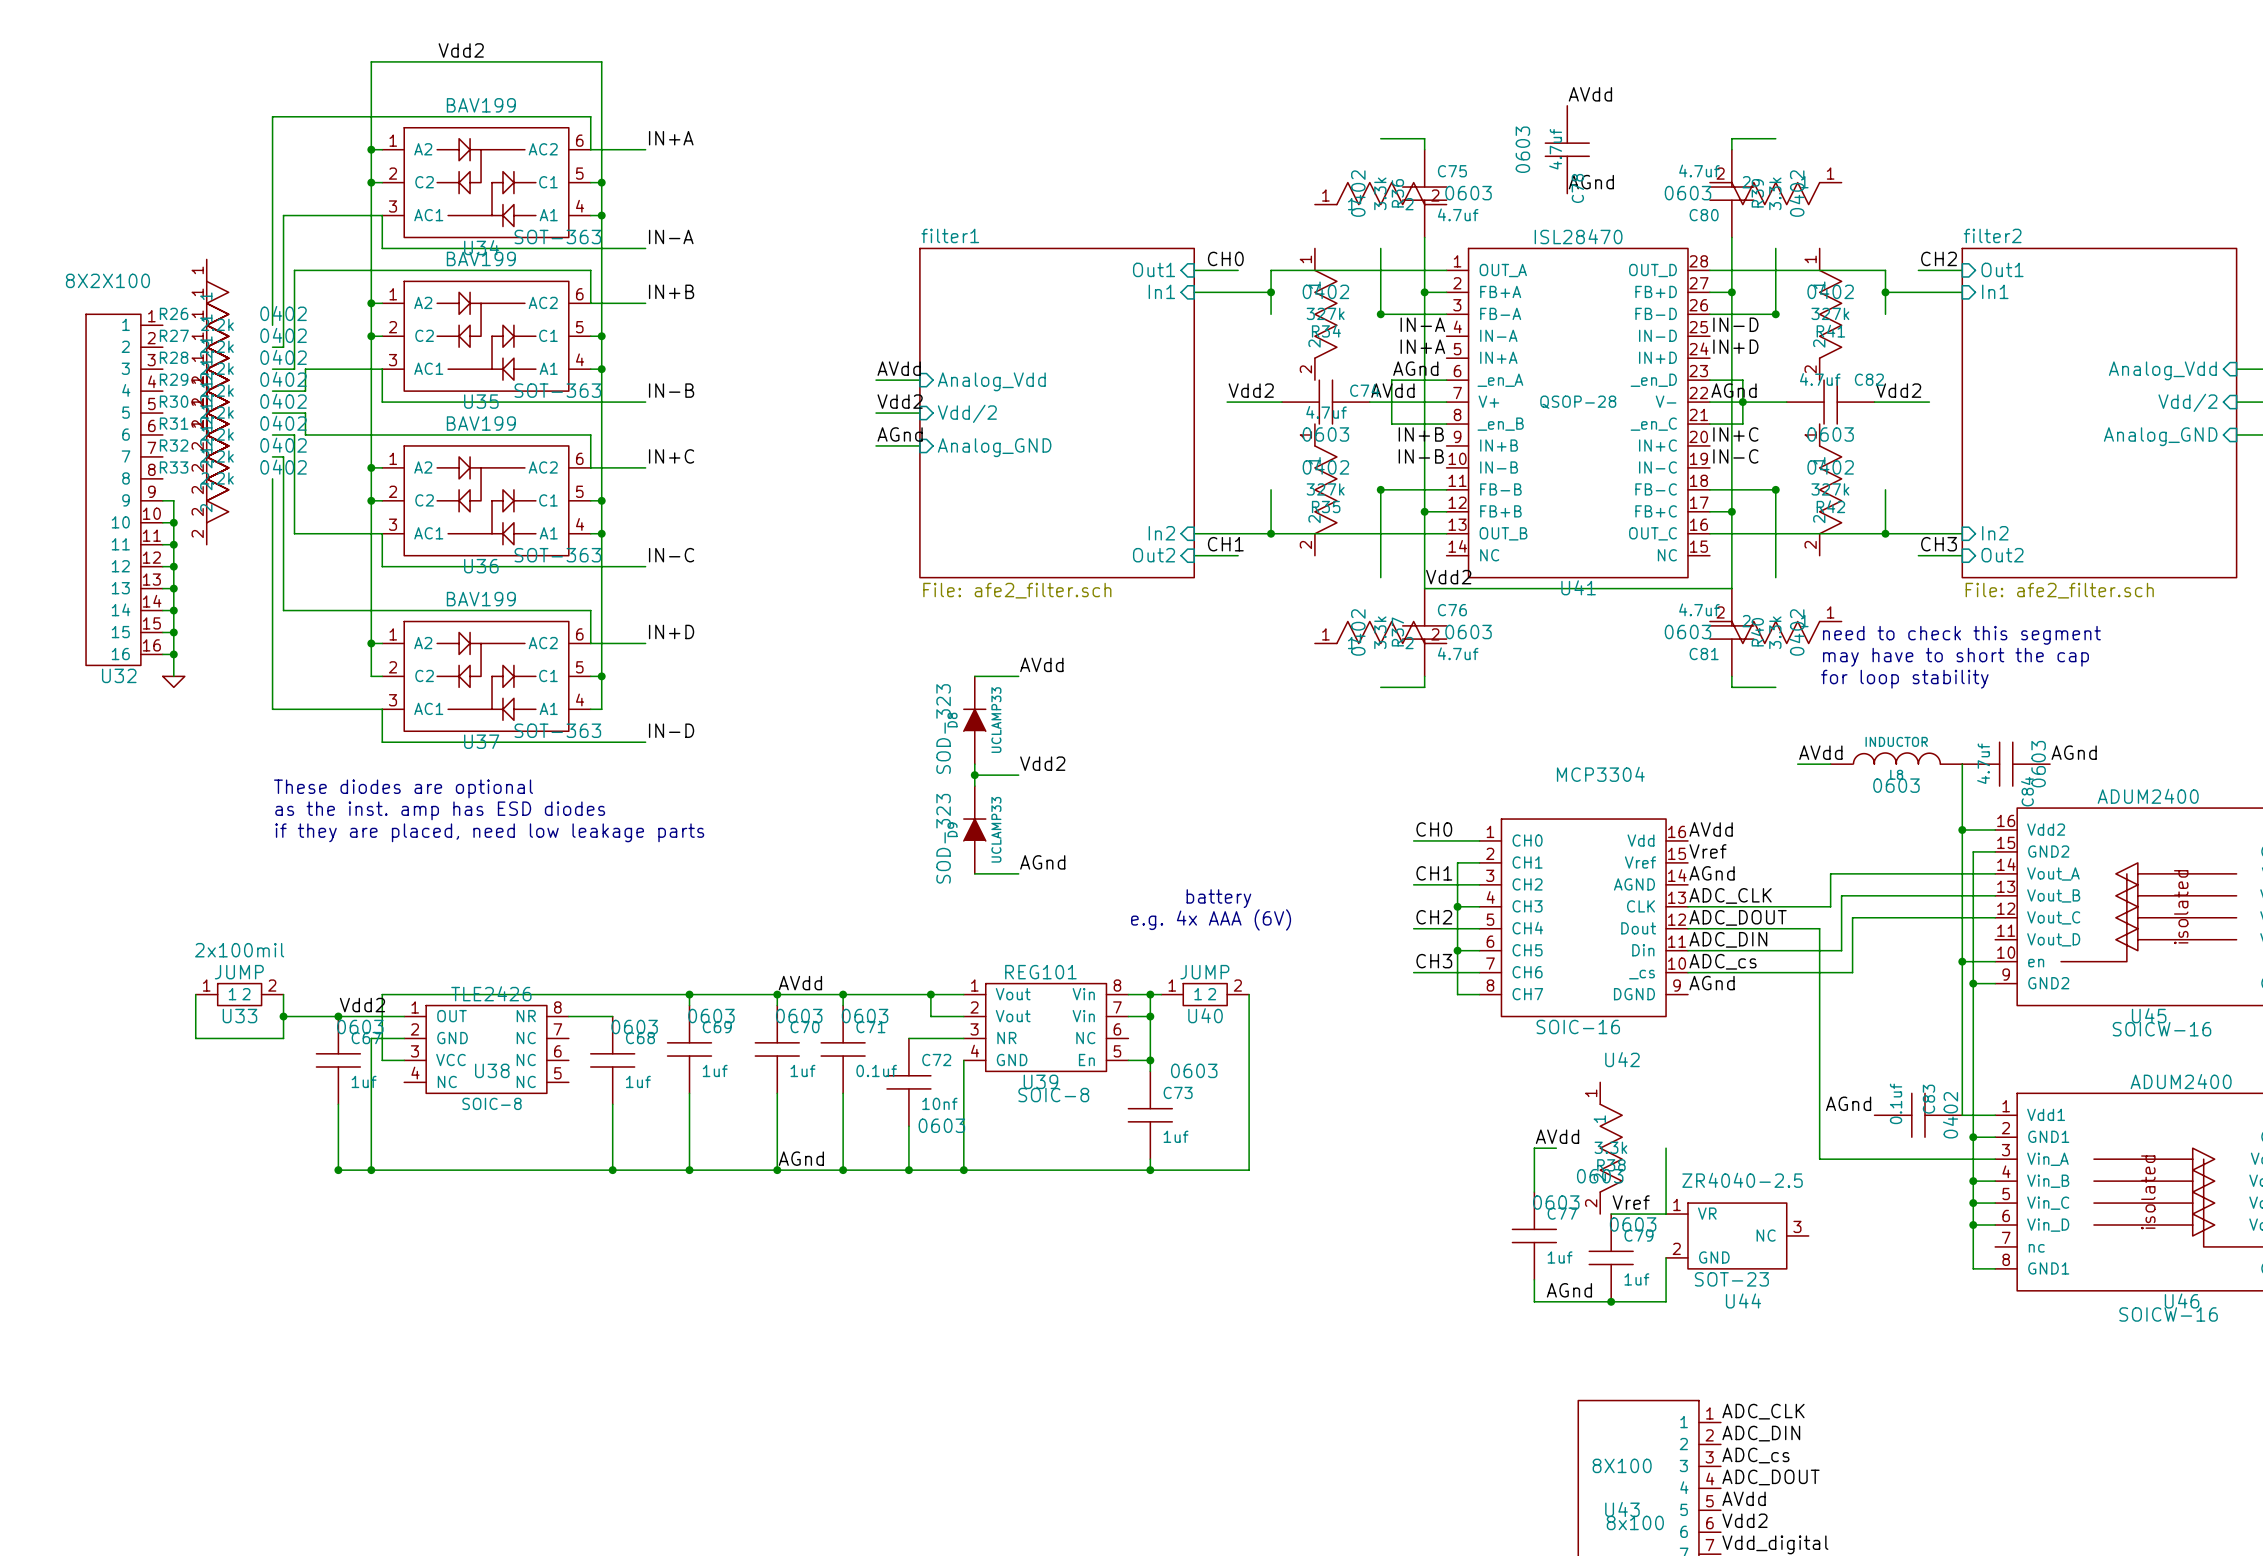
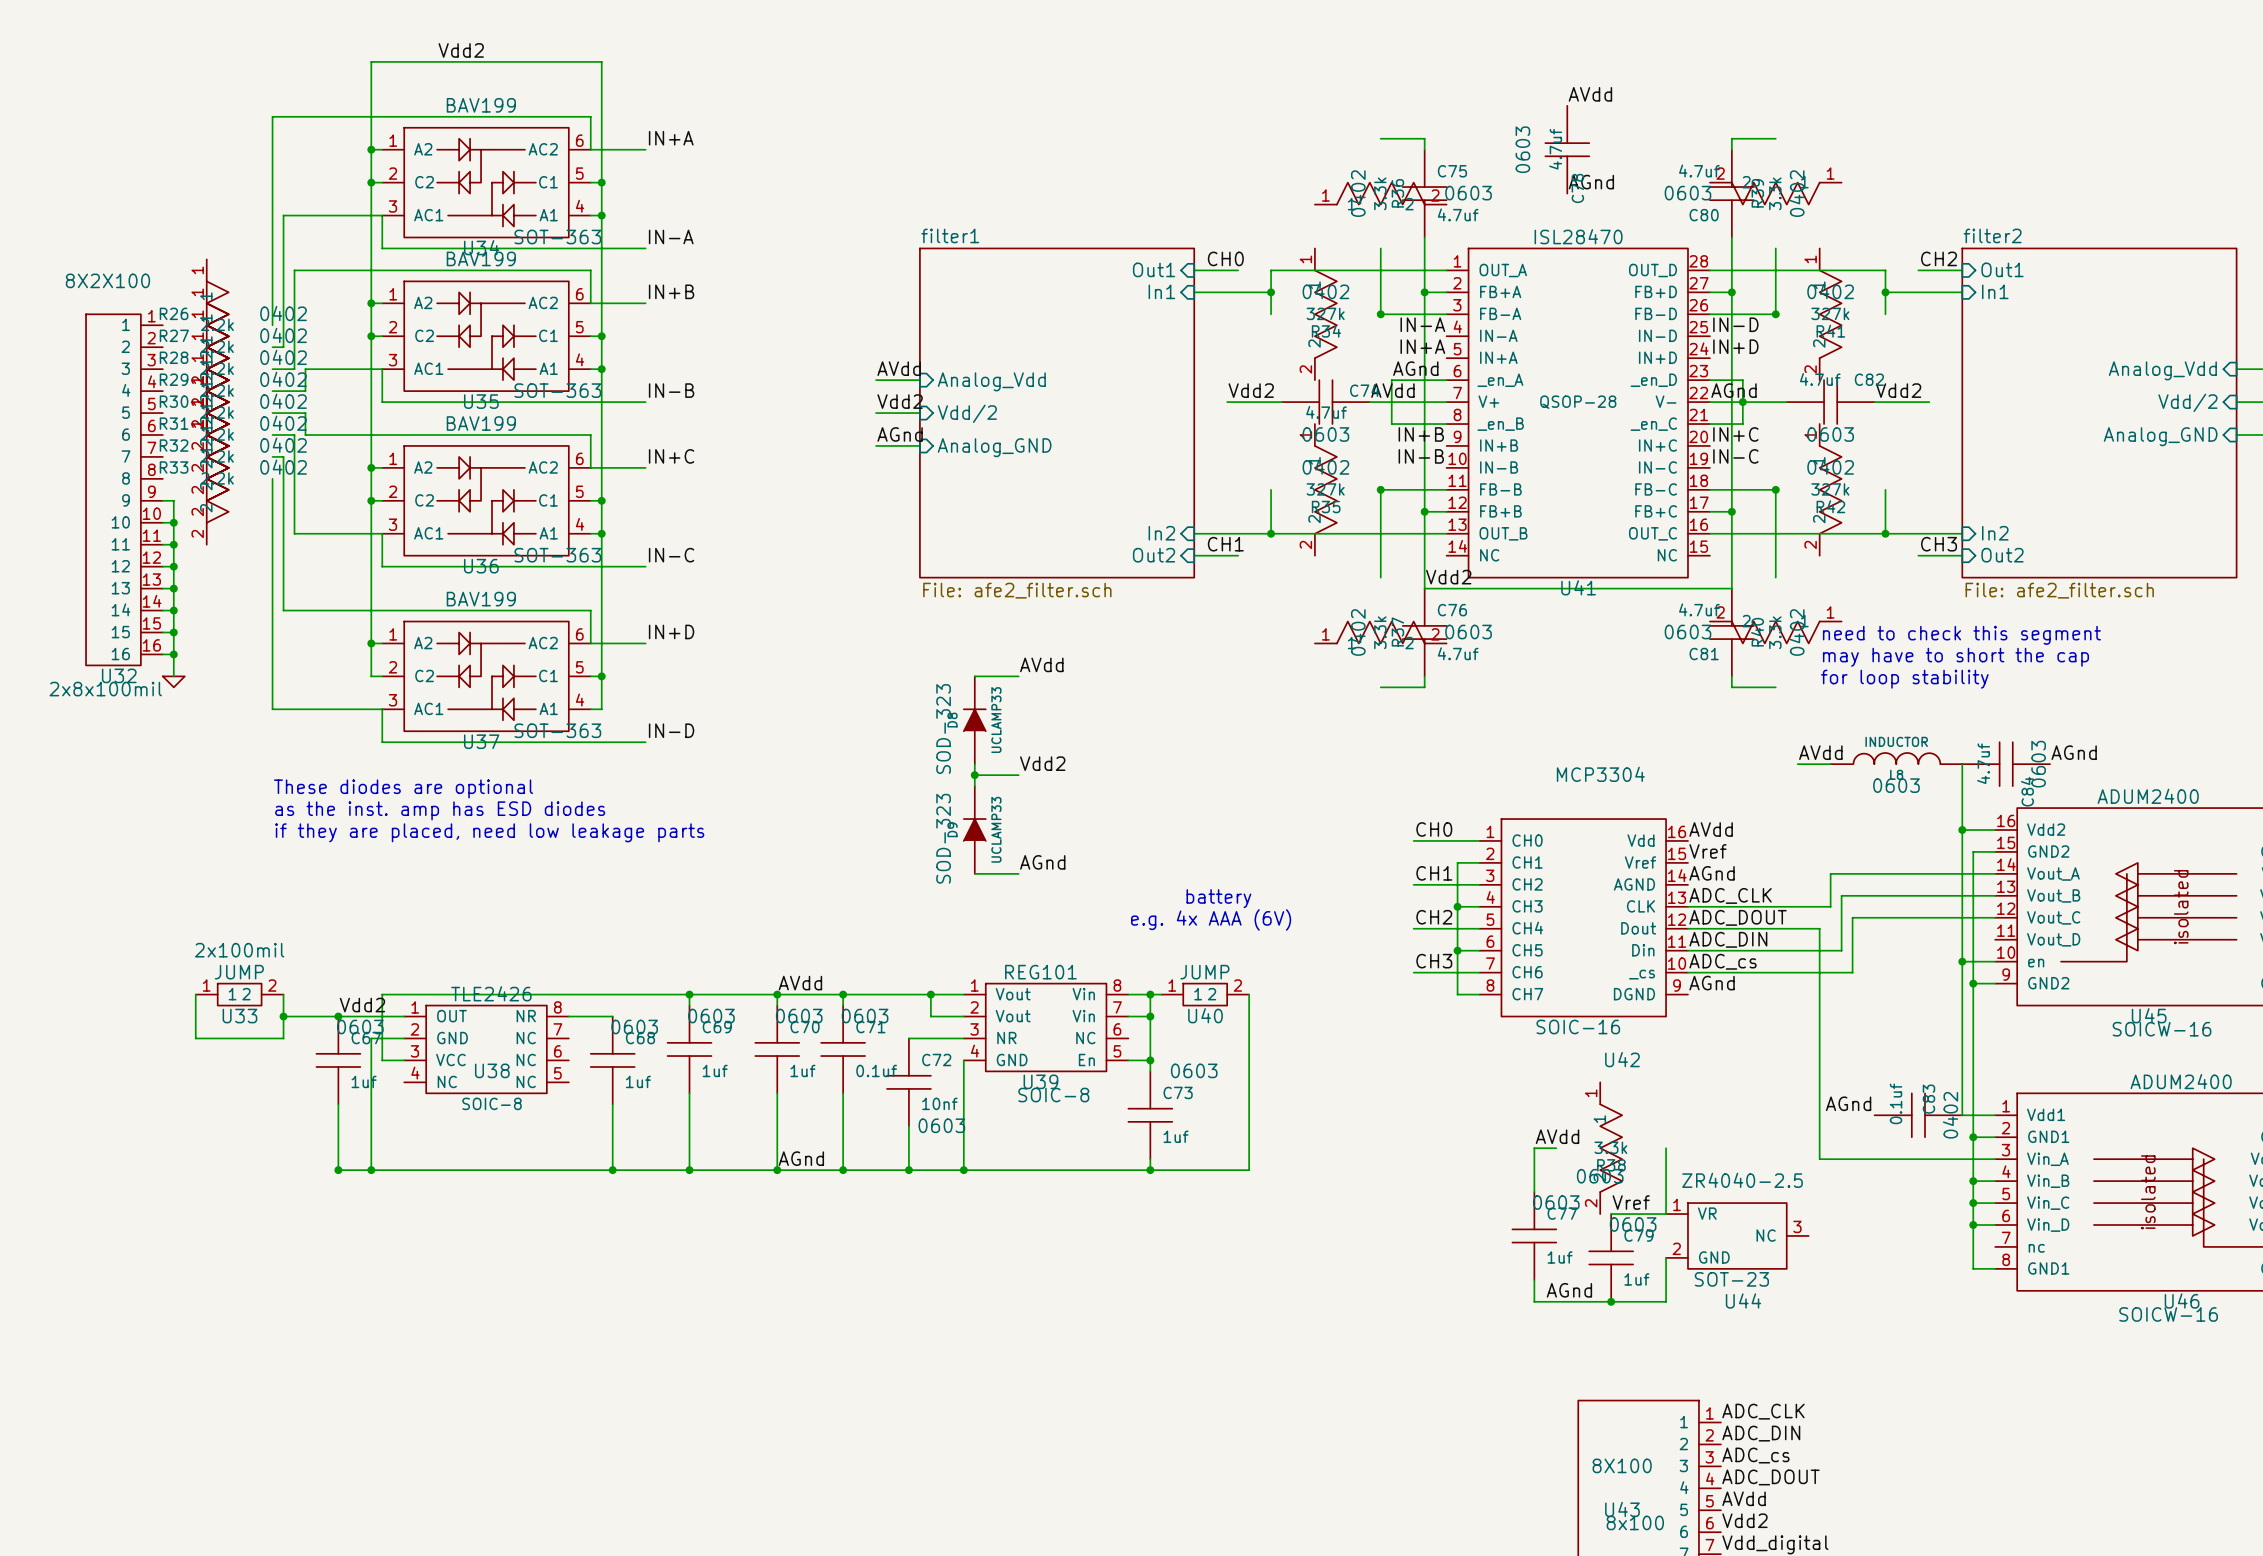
U32 text: none -> 2x8x100mil (105, 689)

